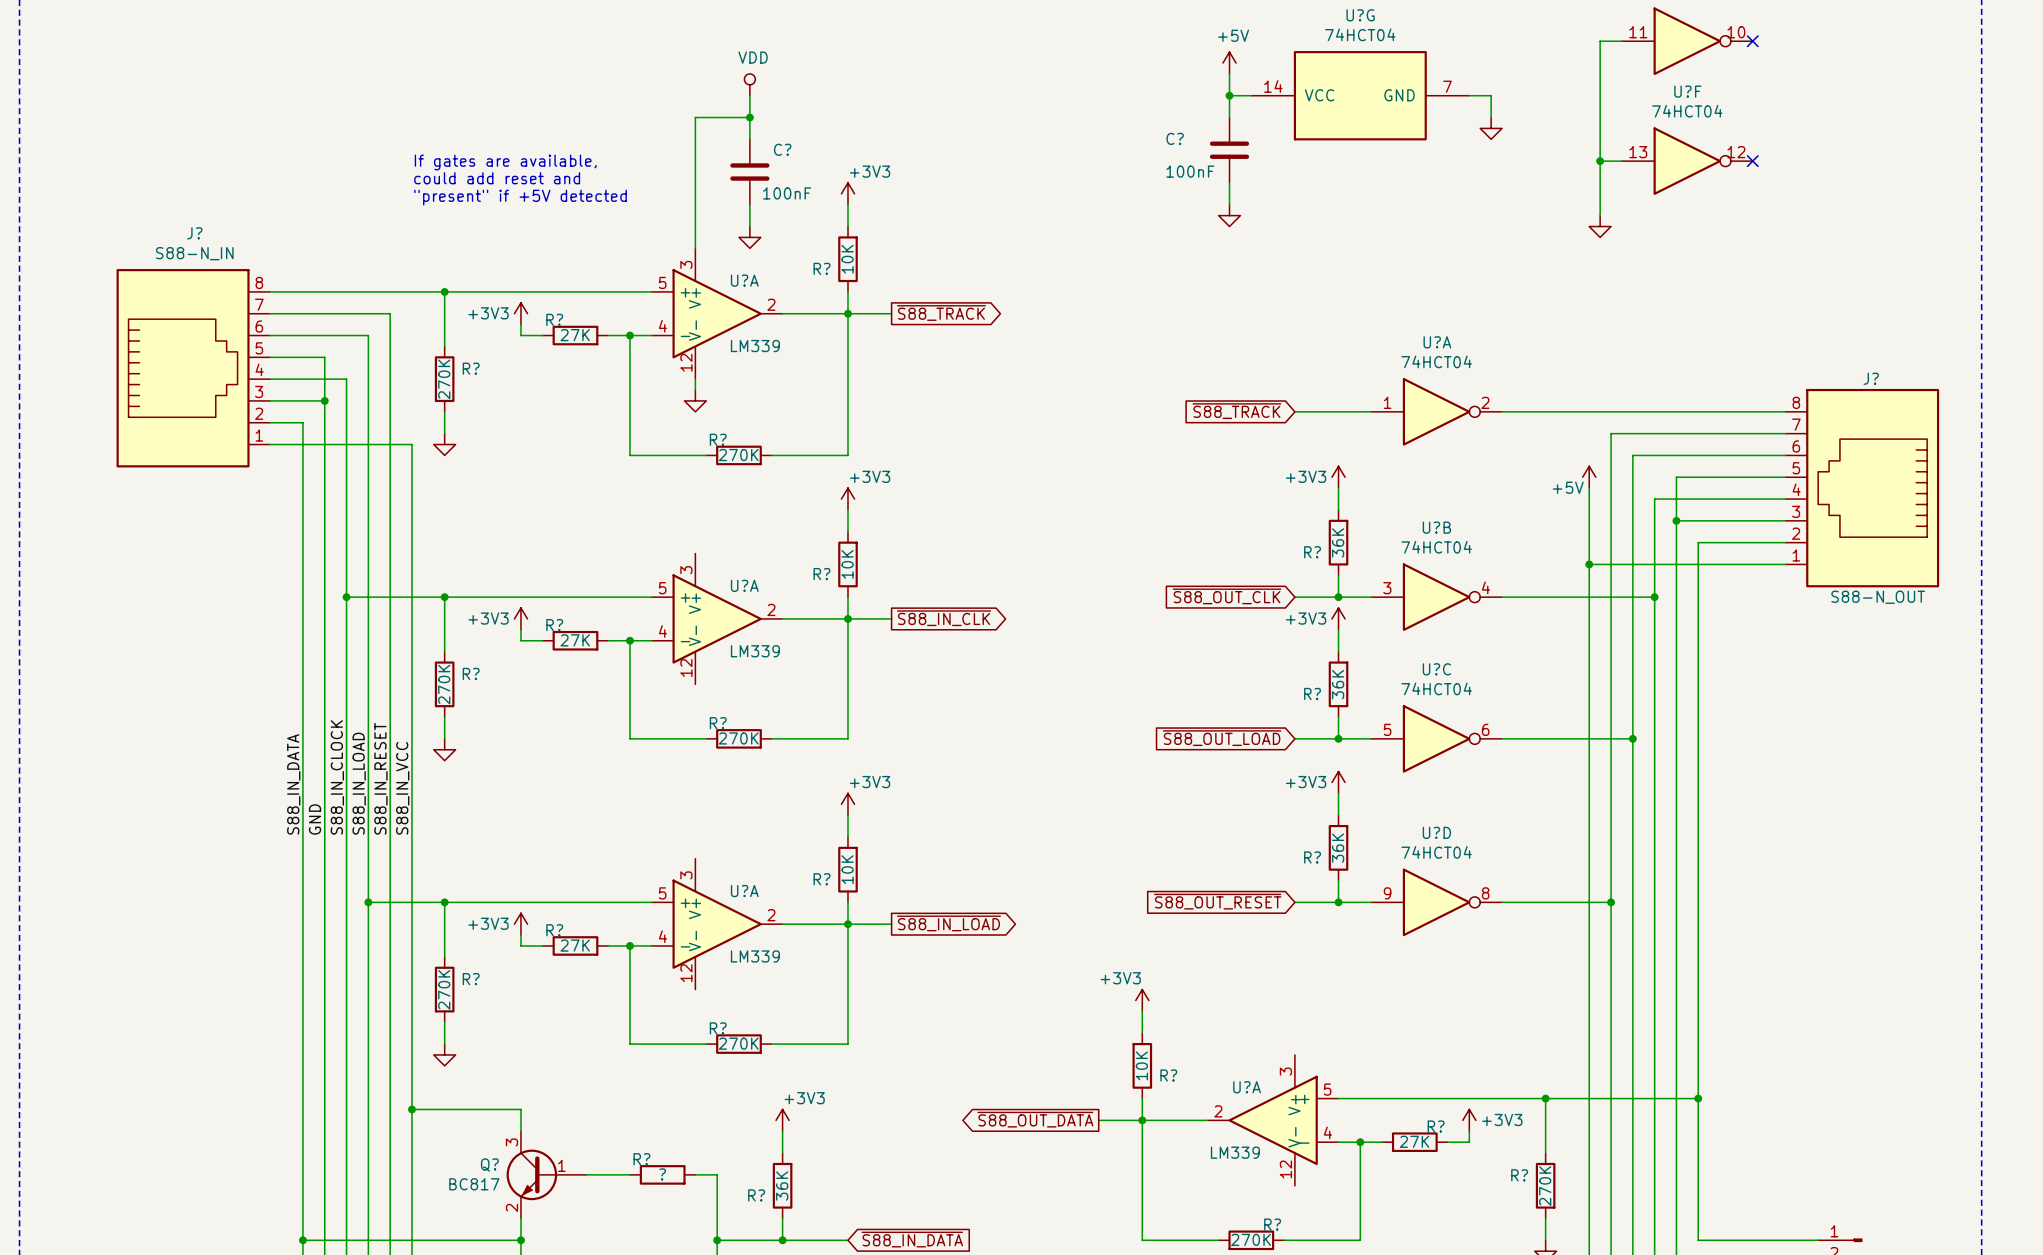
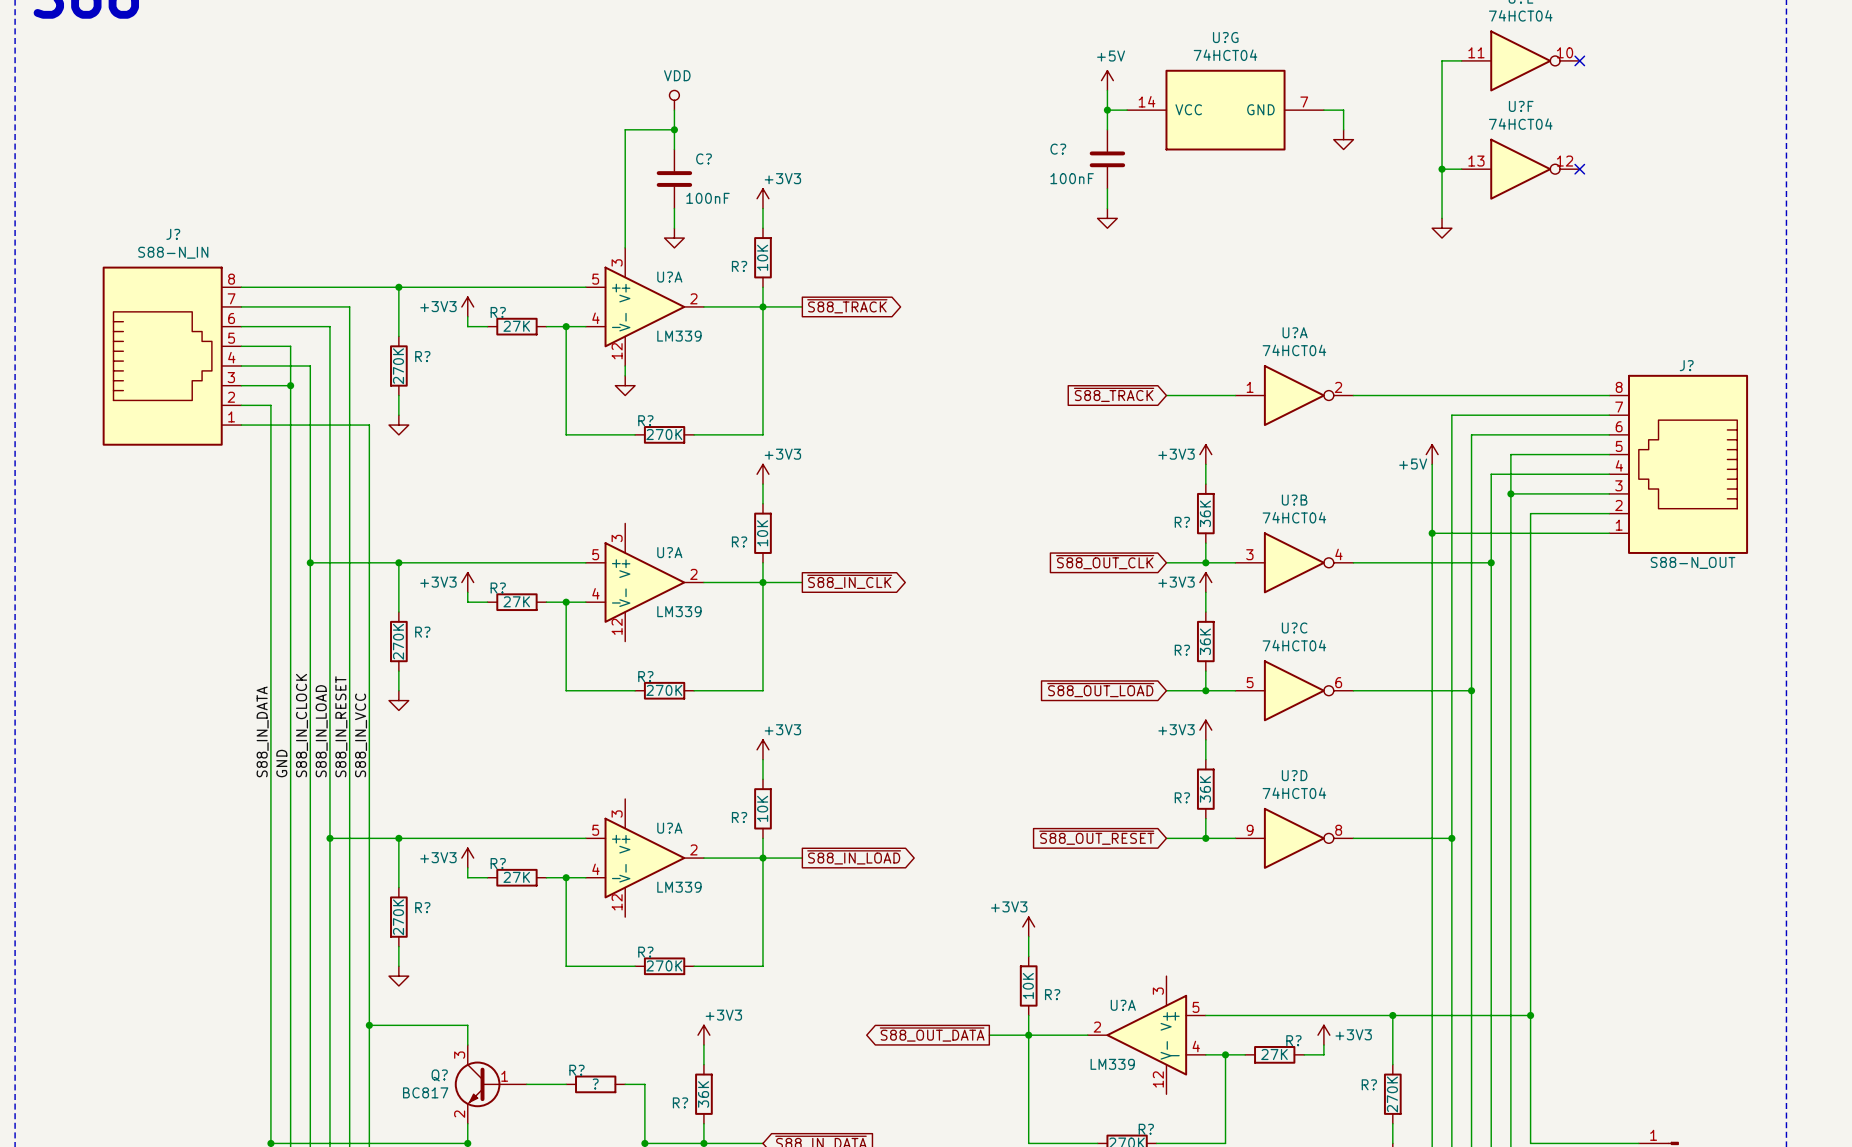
text: If gates are available, (505, 162) -> none
text: could add reset and (497, 178) -> none
text: "present" if +5V detected (520, 197) -> none

